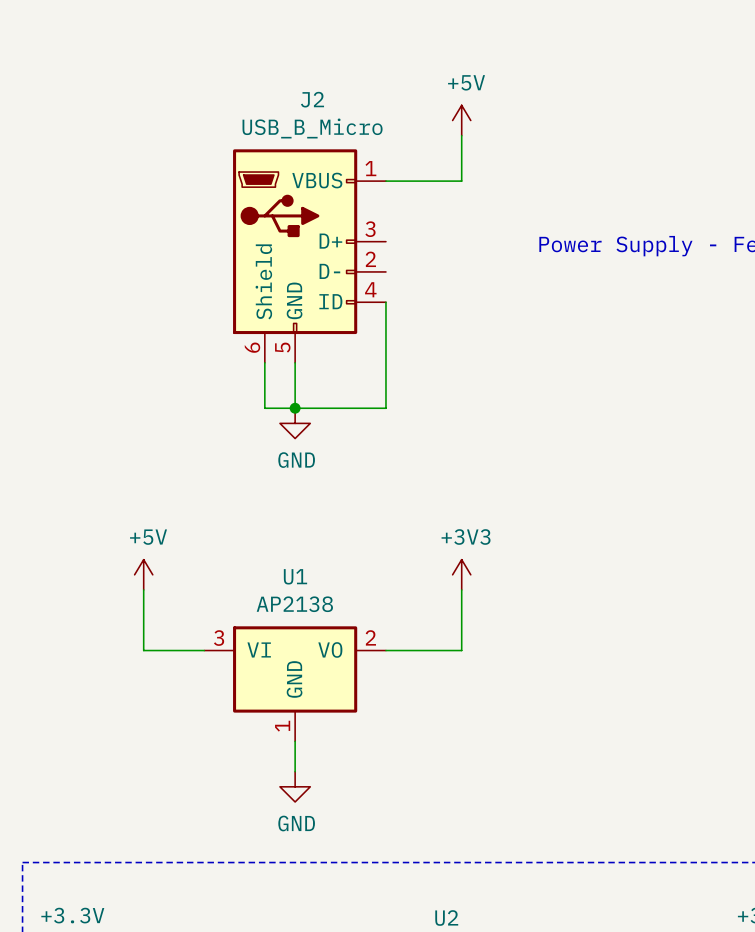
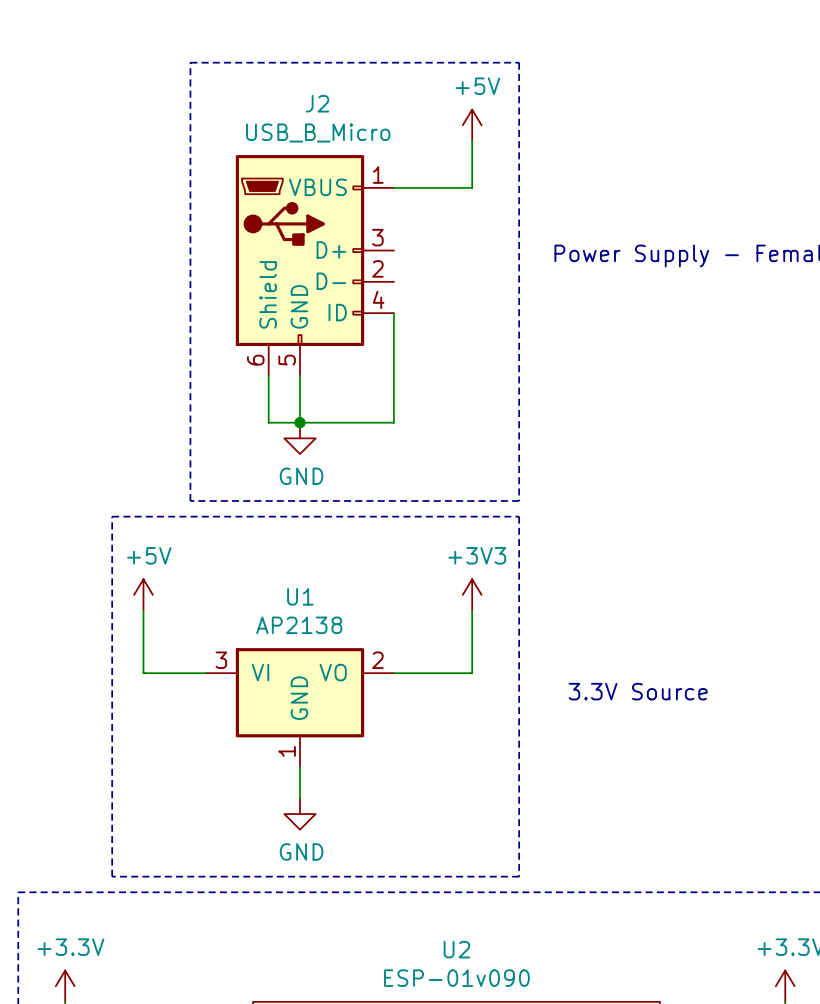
line: none -> (190, 62) (519, 62) (519, 500) (190, 500) (190, 62)
line: none -> (112, 516) (519, 516) (519, 876) (112, 876) (112, 516)
text: none -> 3.3V Source (638, 691)

